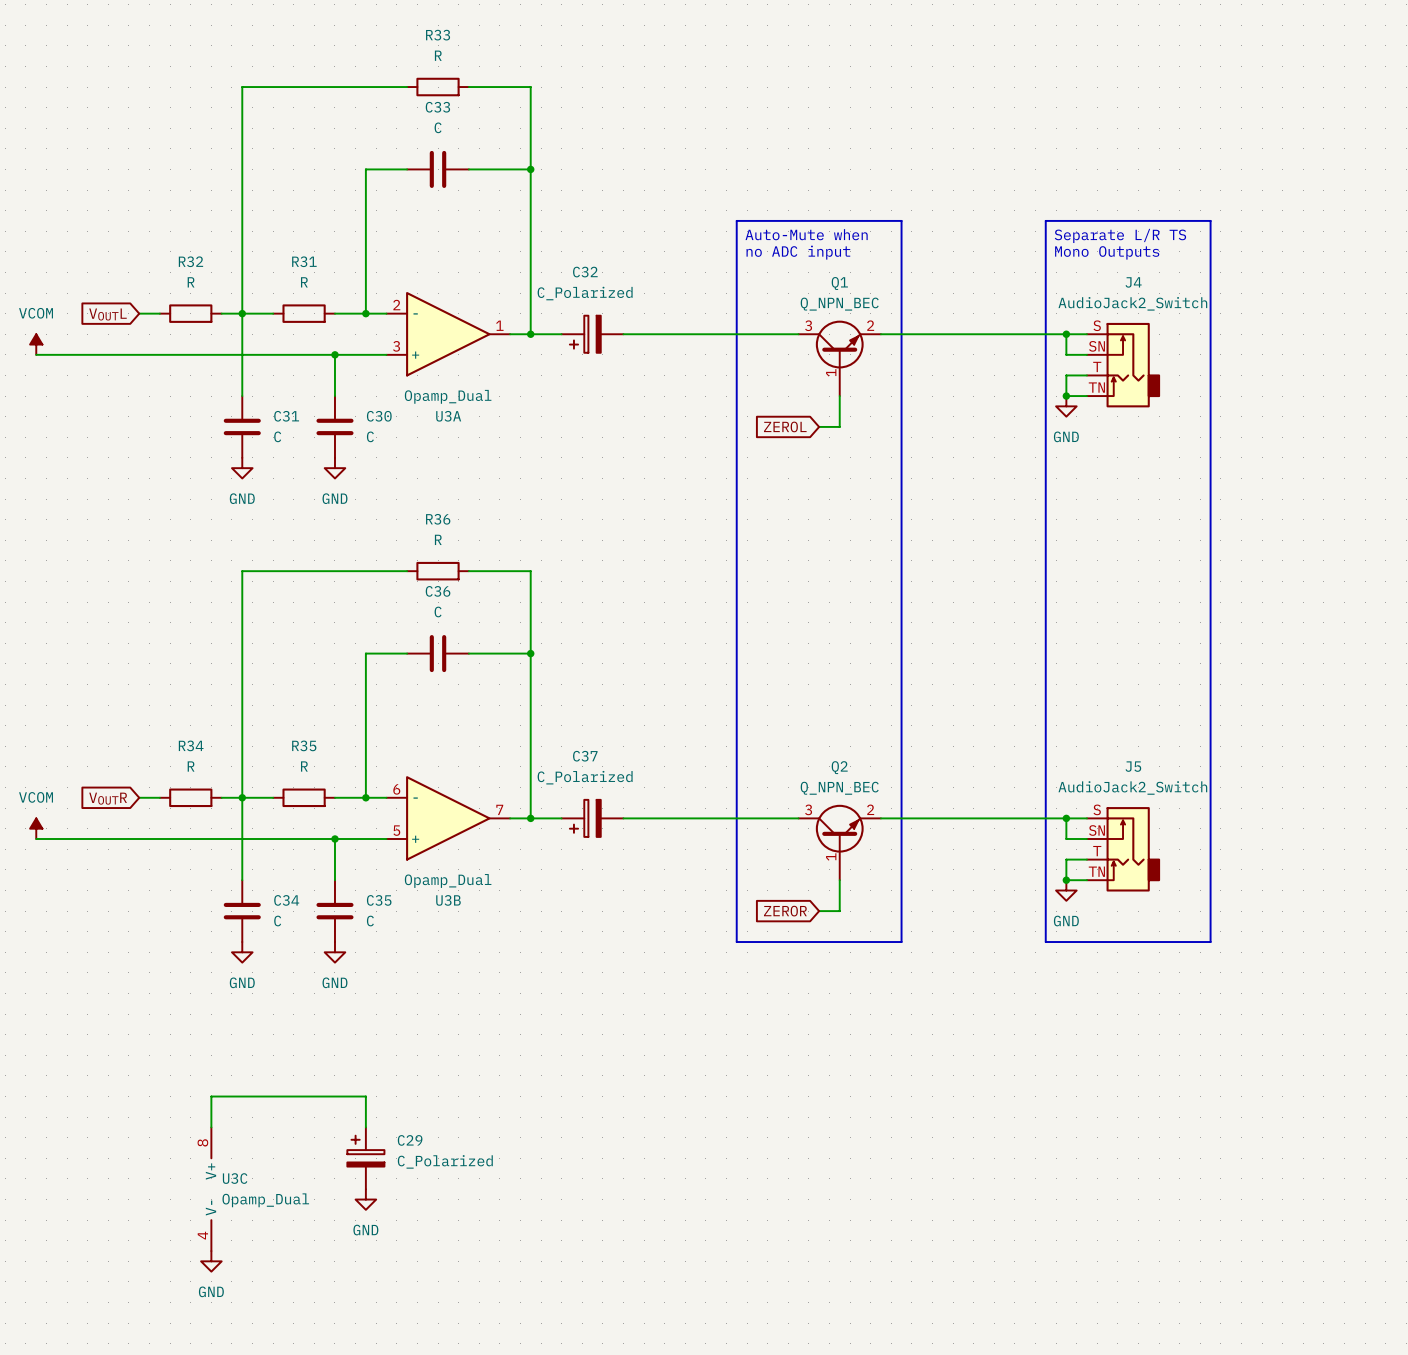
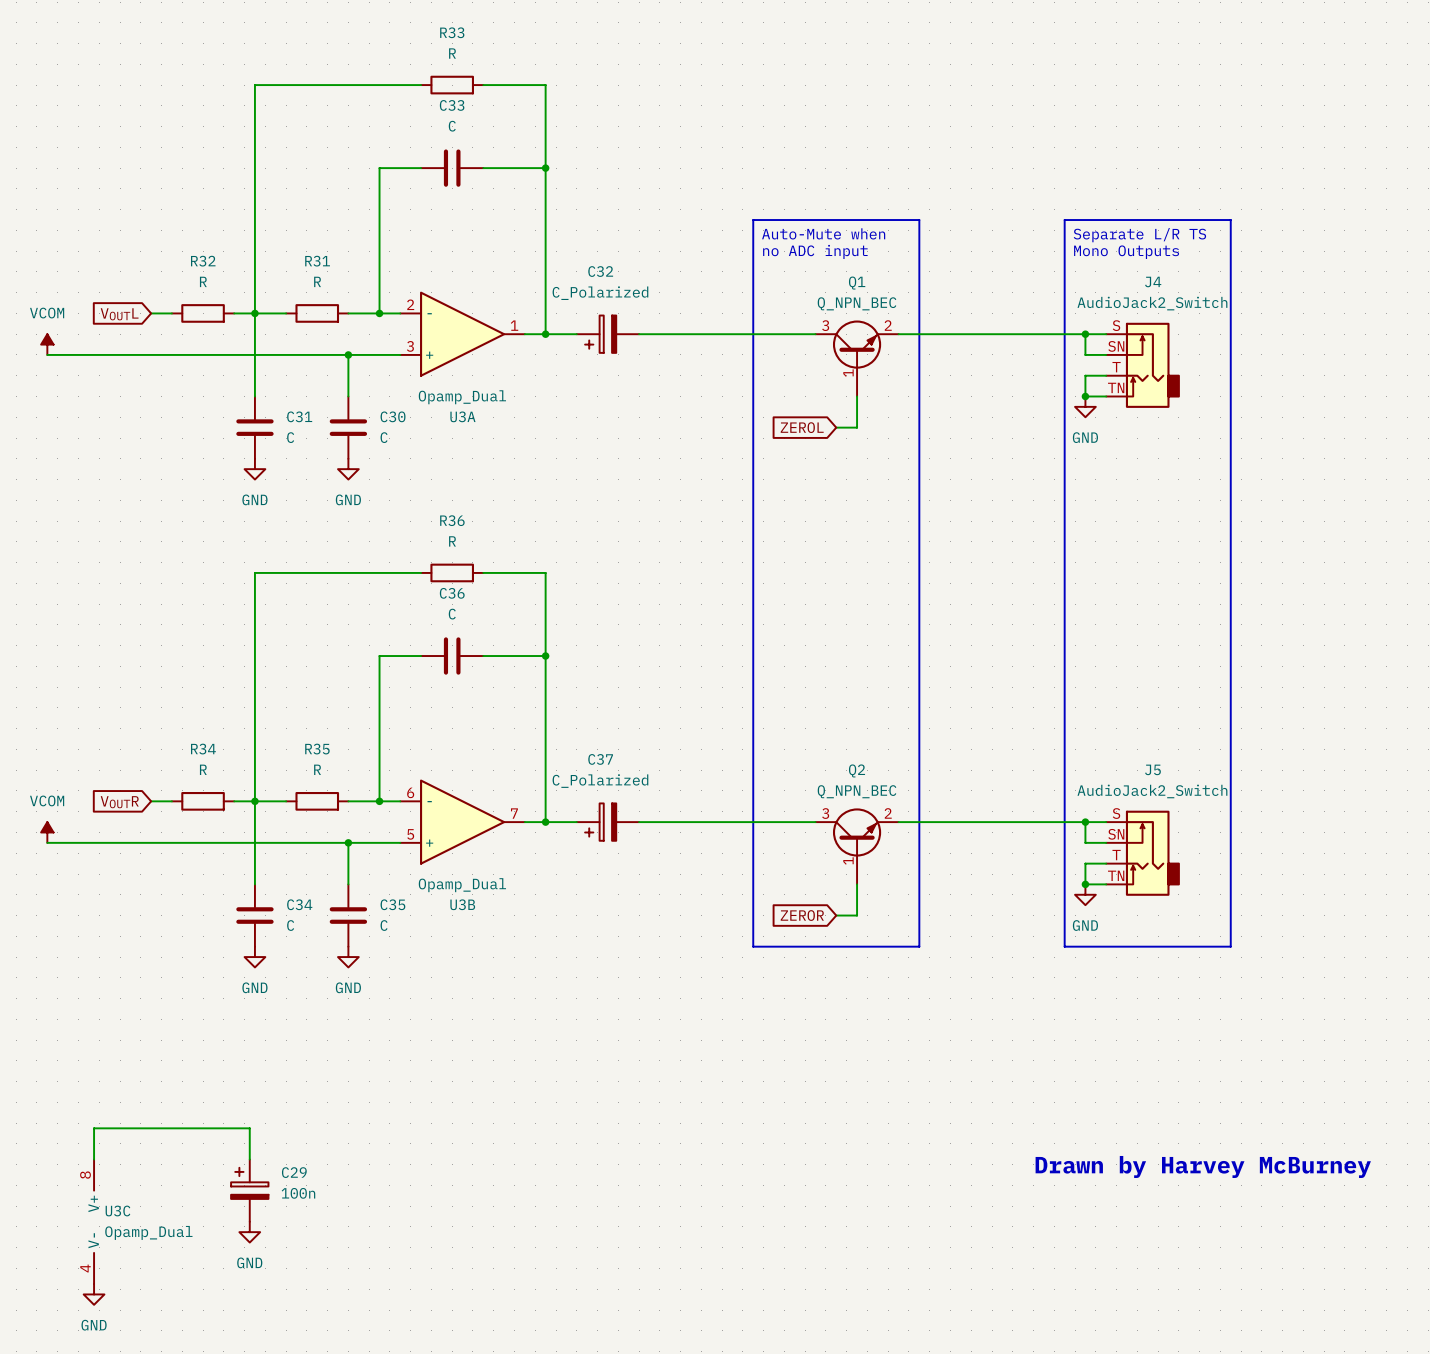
wire: (211, 1127) (211, 1096) (365, 1096) (365, 1127) -> (94, 1159) (94, 1128) (249, 1128) (249, 1159)
C29 position: (365, 1158) -> (249, 1190)
text: none -> Drawn by Harvey McBurney (1203, 1166)
C29 value: C_Polarized (445, 1161) -> 100n (298, 1193)
U3C position: (211, 1189) -> (94, 1221)
power symbol: GND (365, 1199) -> none
power symbol position: GND (211, 1261) -> GND (249, 1232)
power symbol: none -> GND (94, 1294)

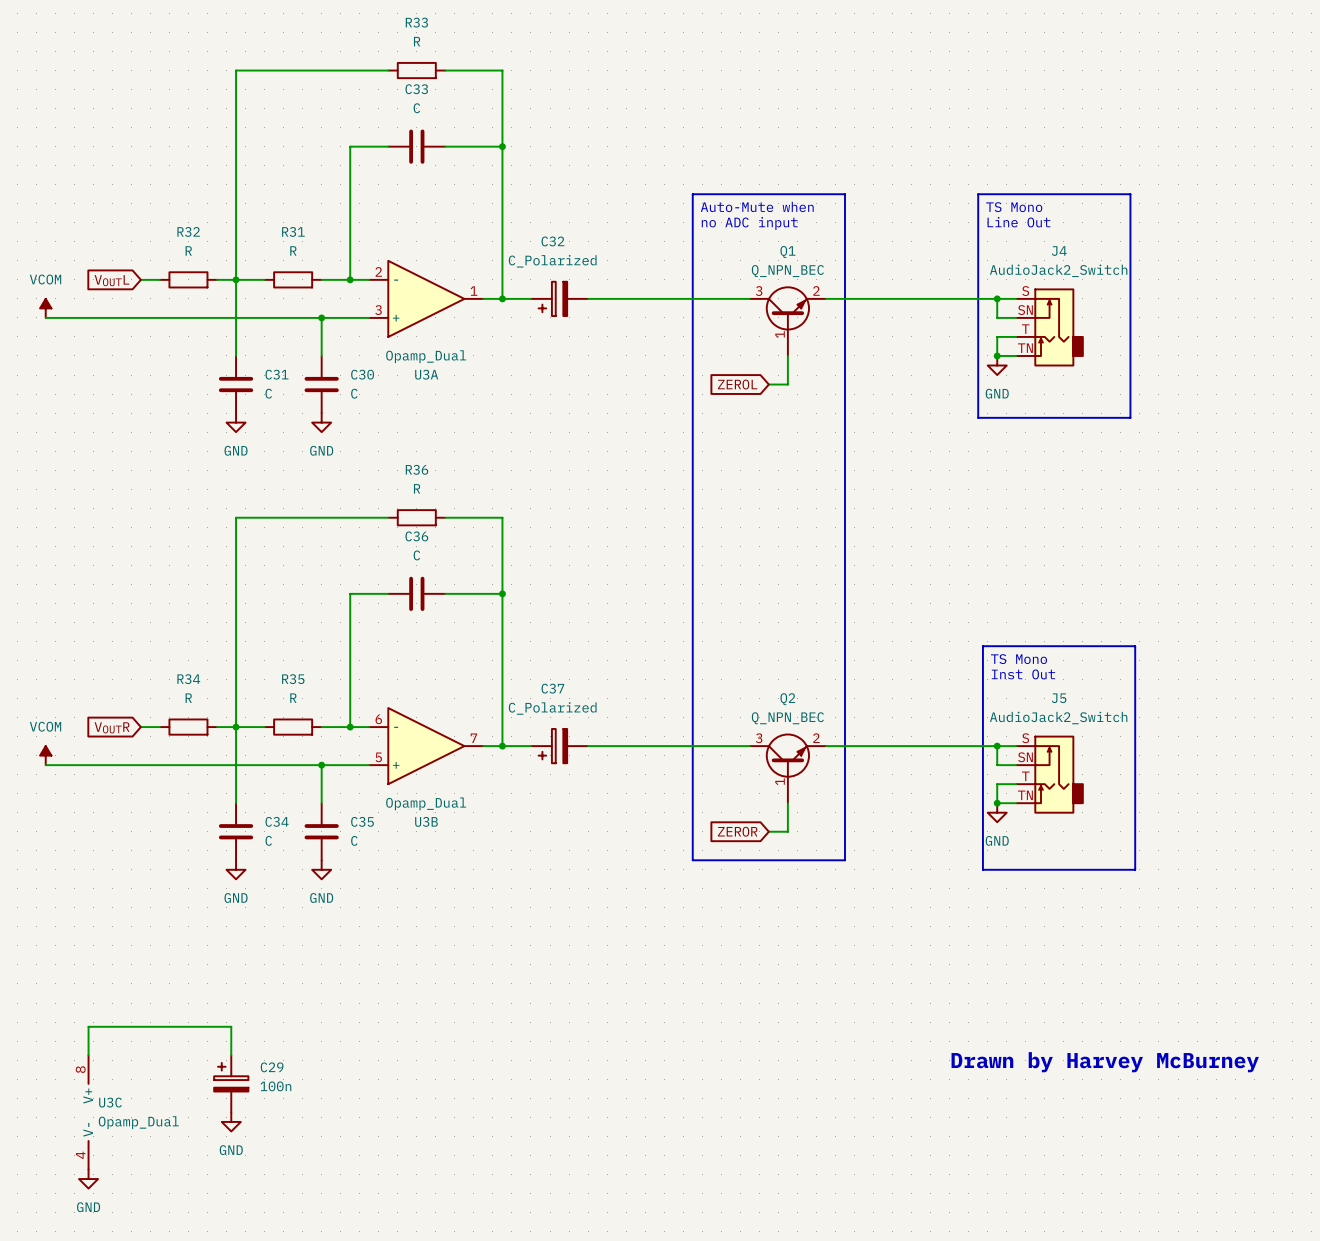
text: Separate L/R TS (1139, 235) -> TS Mono (1014, 207)
text: Mono Outputs (1126, 252) -> Line Out (1018, 222)
line: (1064, 463) (1064, 946) (1230, 946) (1230, 463) -> (978, 417) (1130, 417)
line: none -> (982, 646) (1135, 646) (1135, 869) (982, 869) (982, 646)
text: none -> TS Mono (1019, 659)
text: none -> Inst Out (1023, 674)

